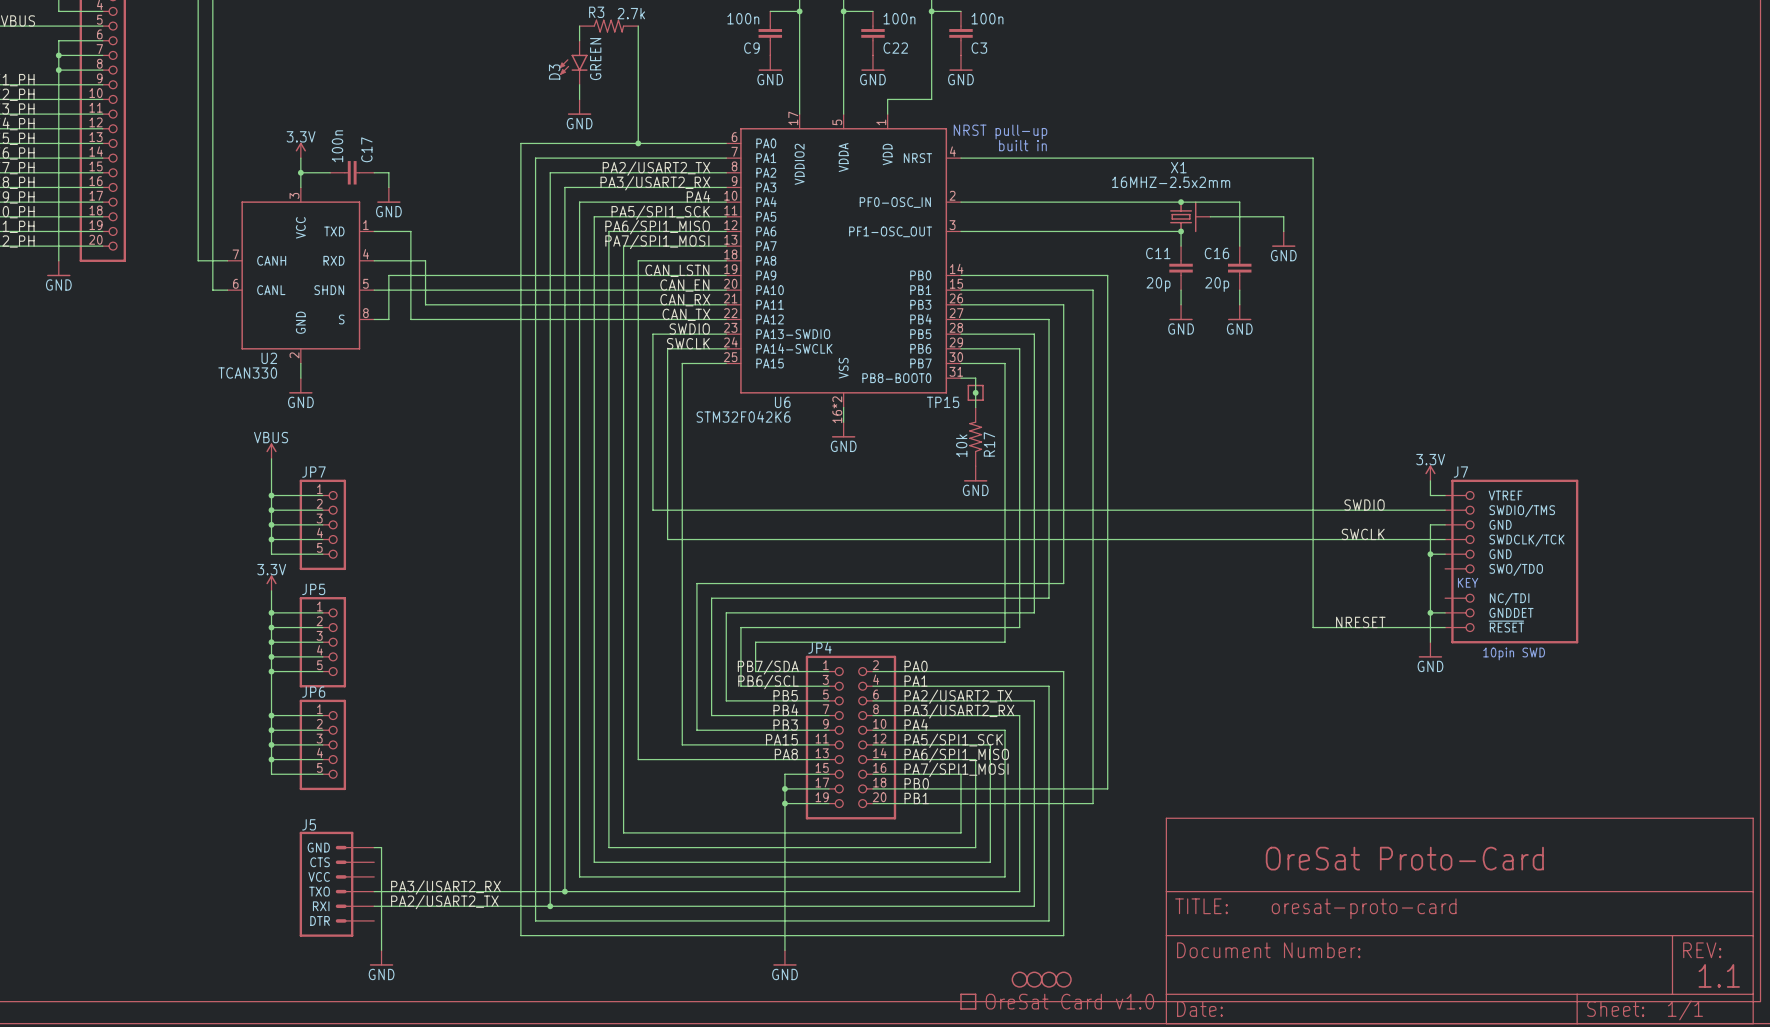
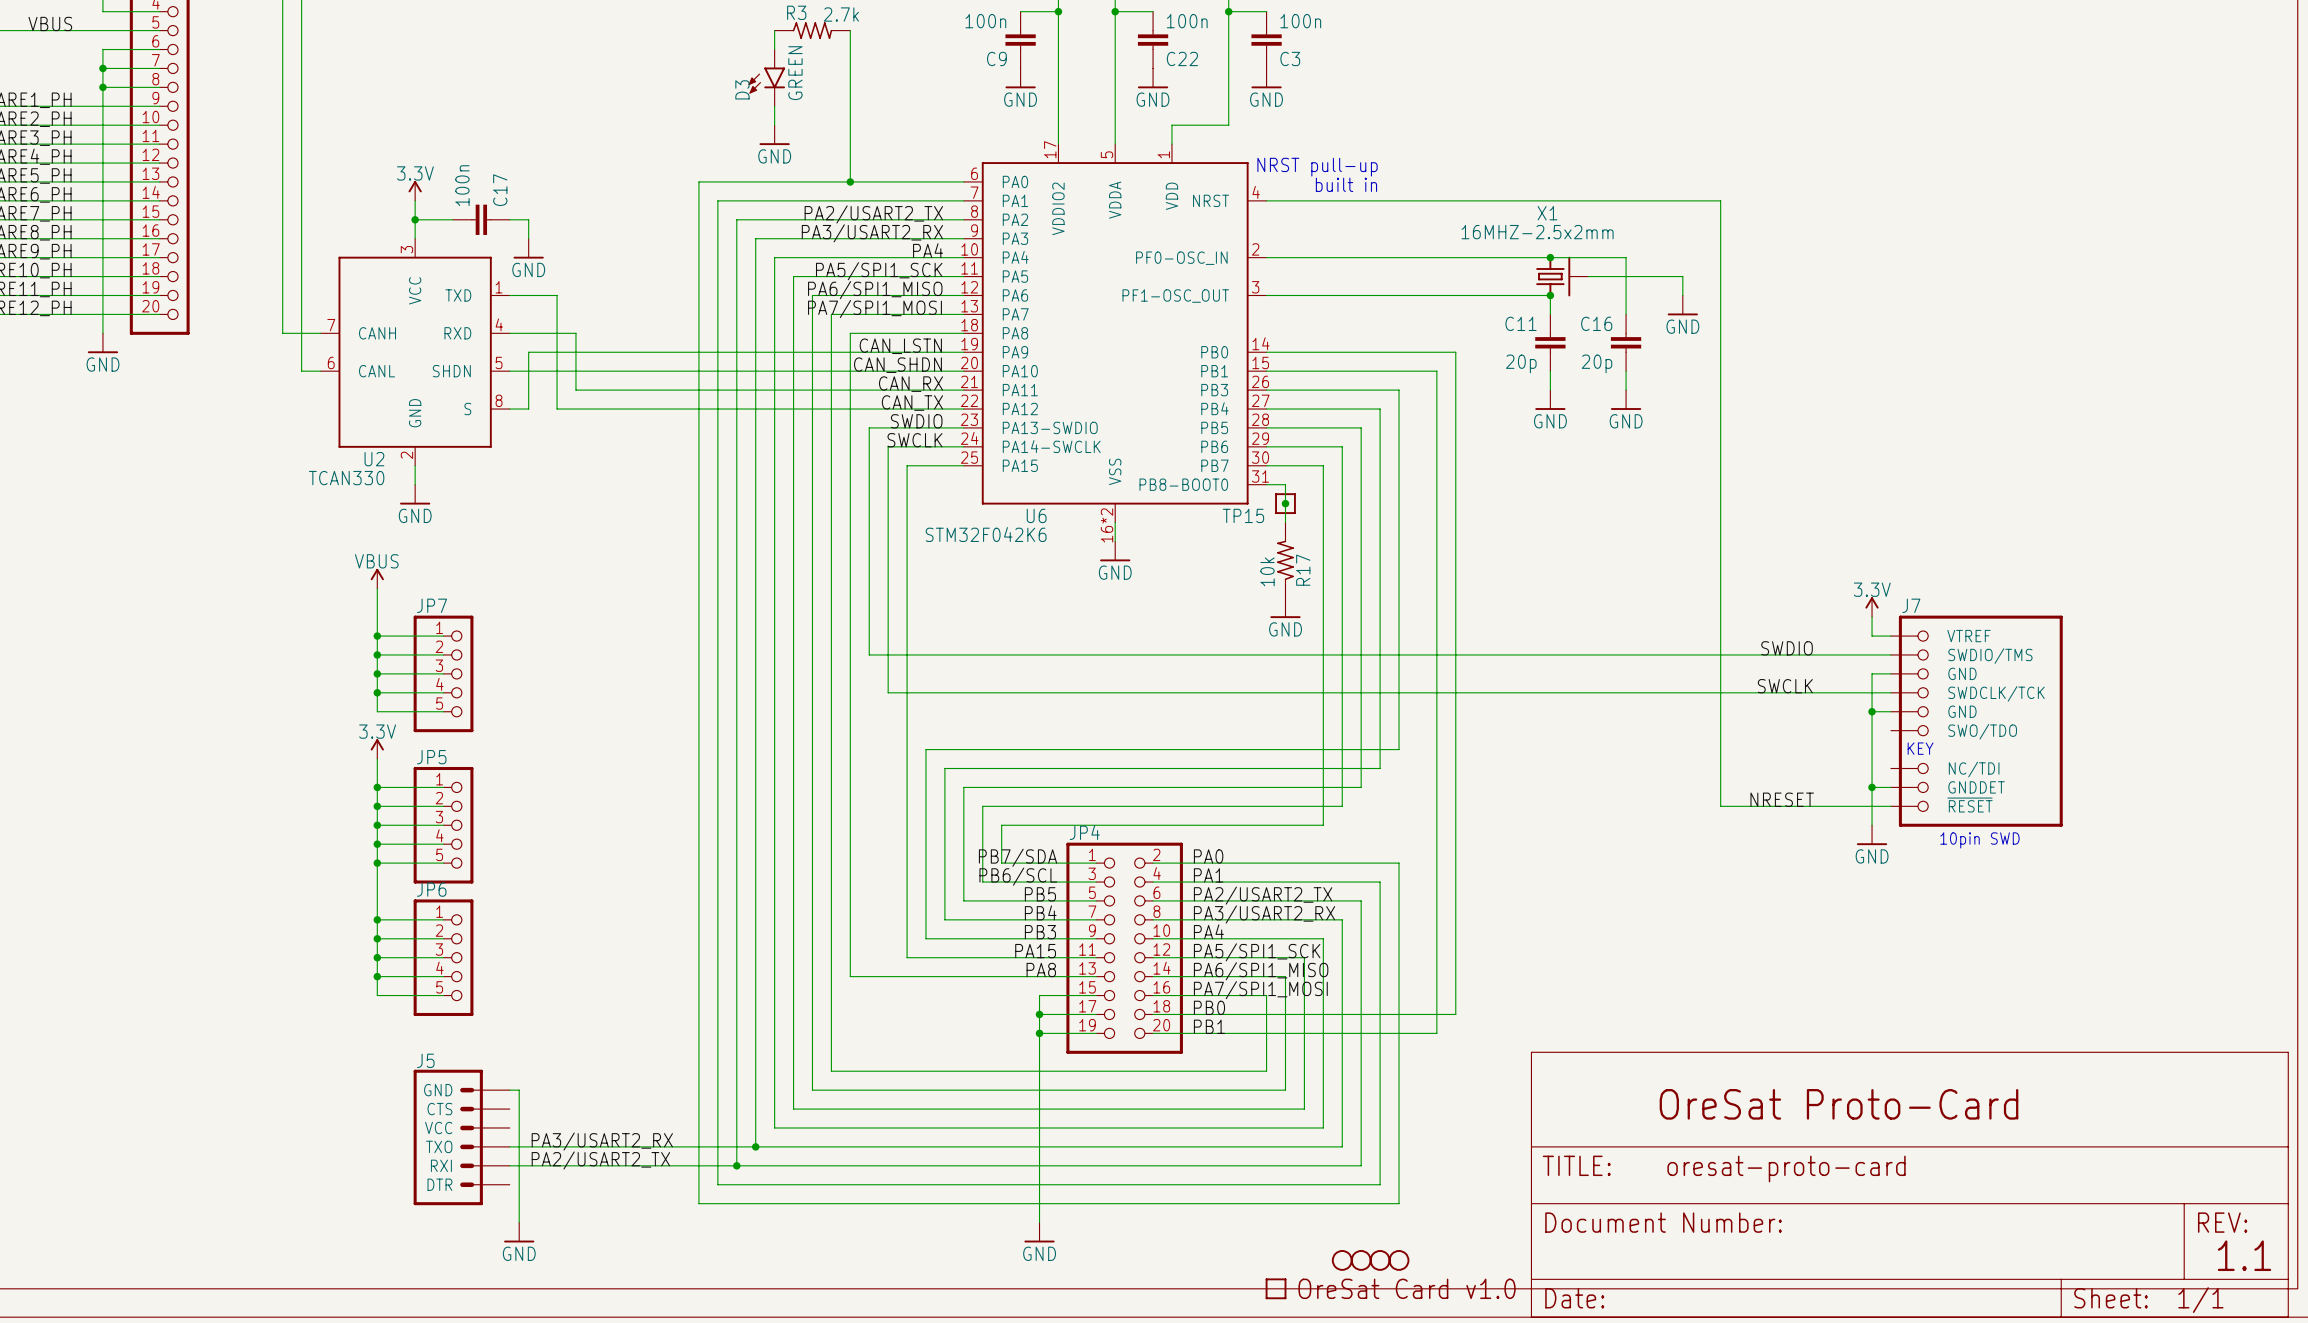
label: CAN_EN (684, 285) -> CAN_SHDN (897, 365)

